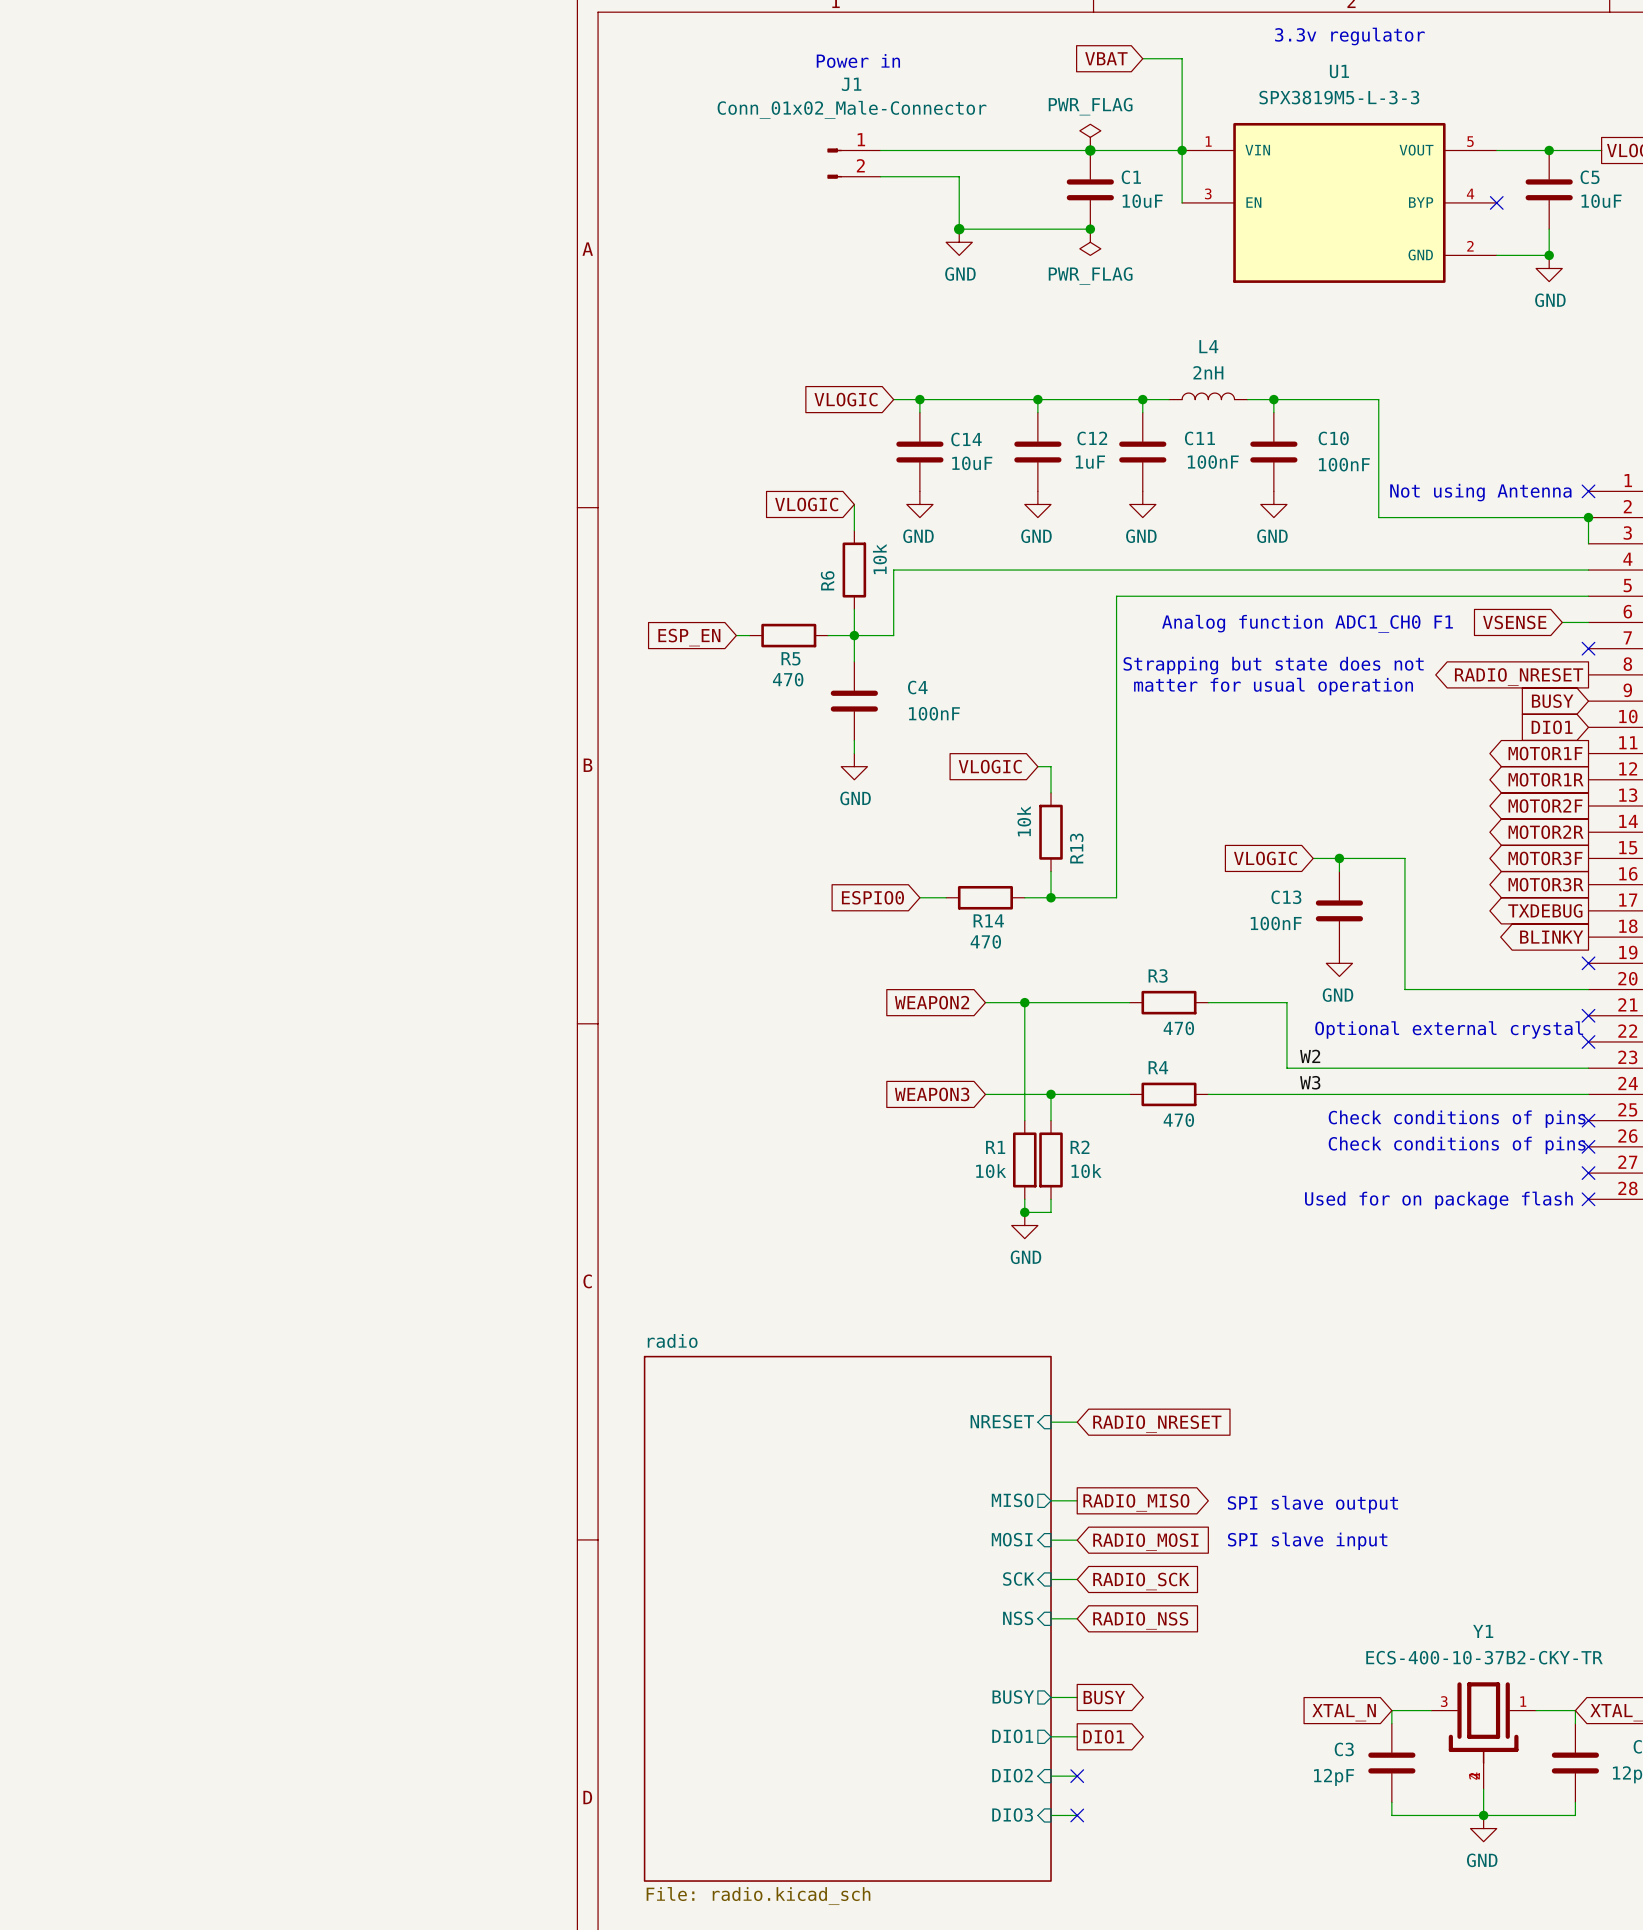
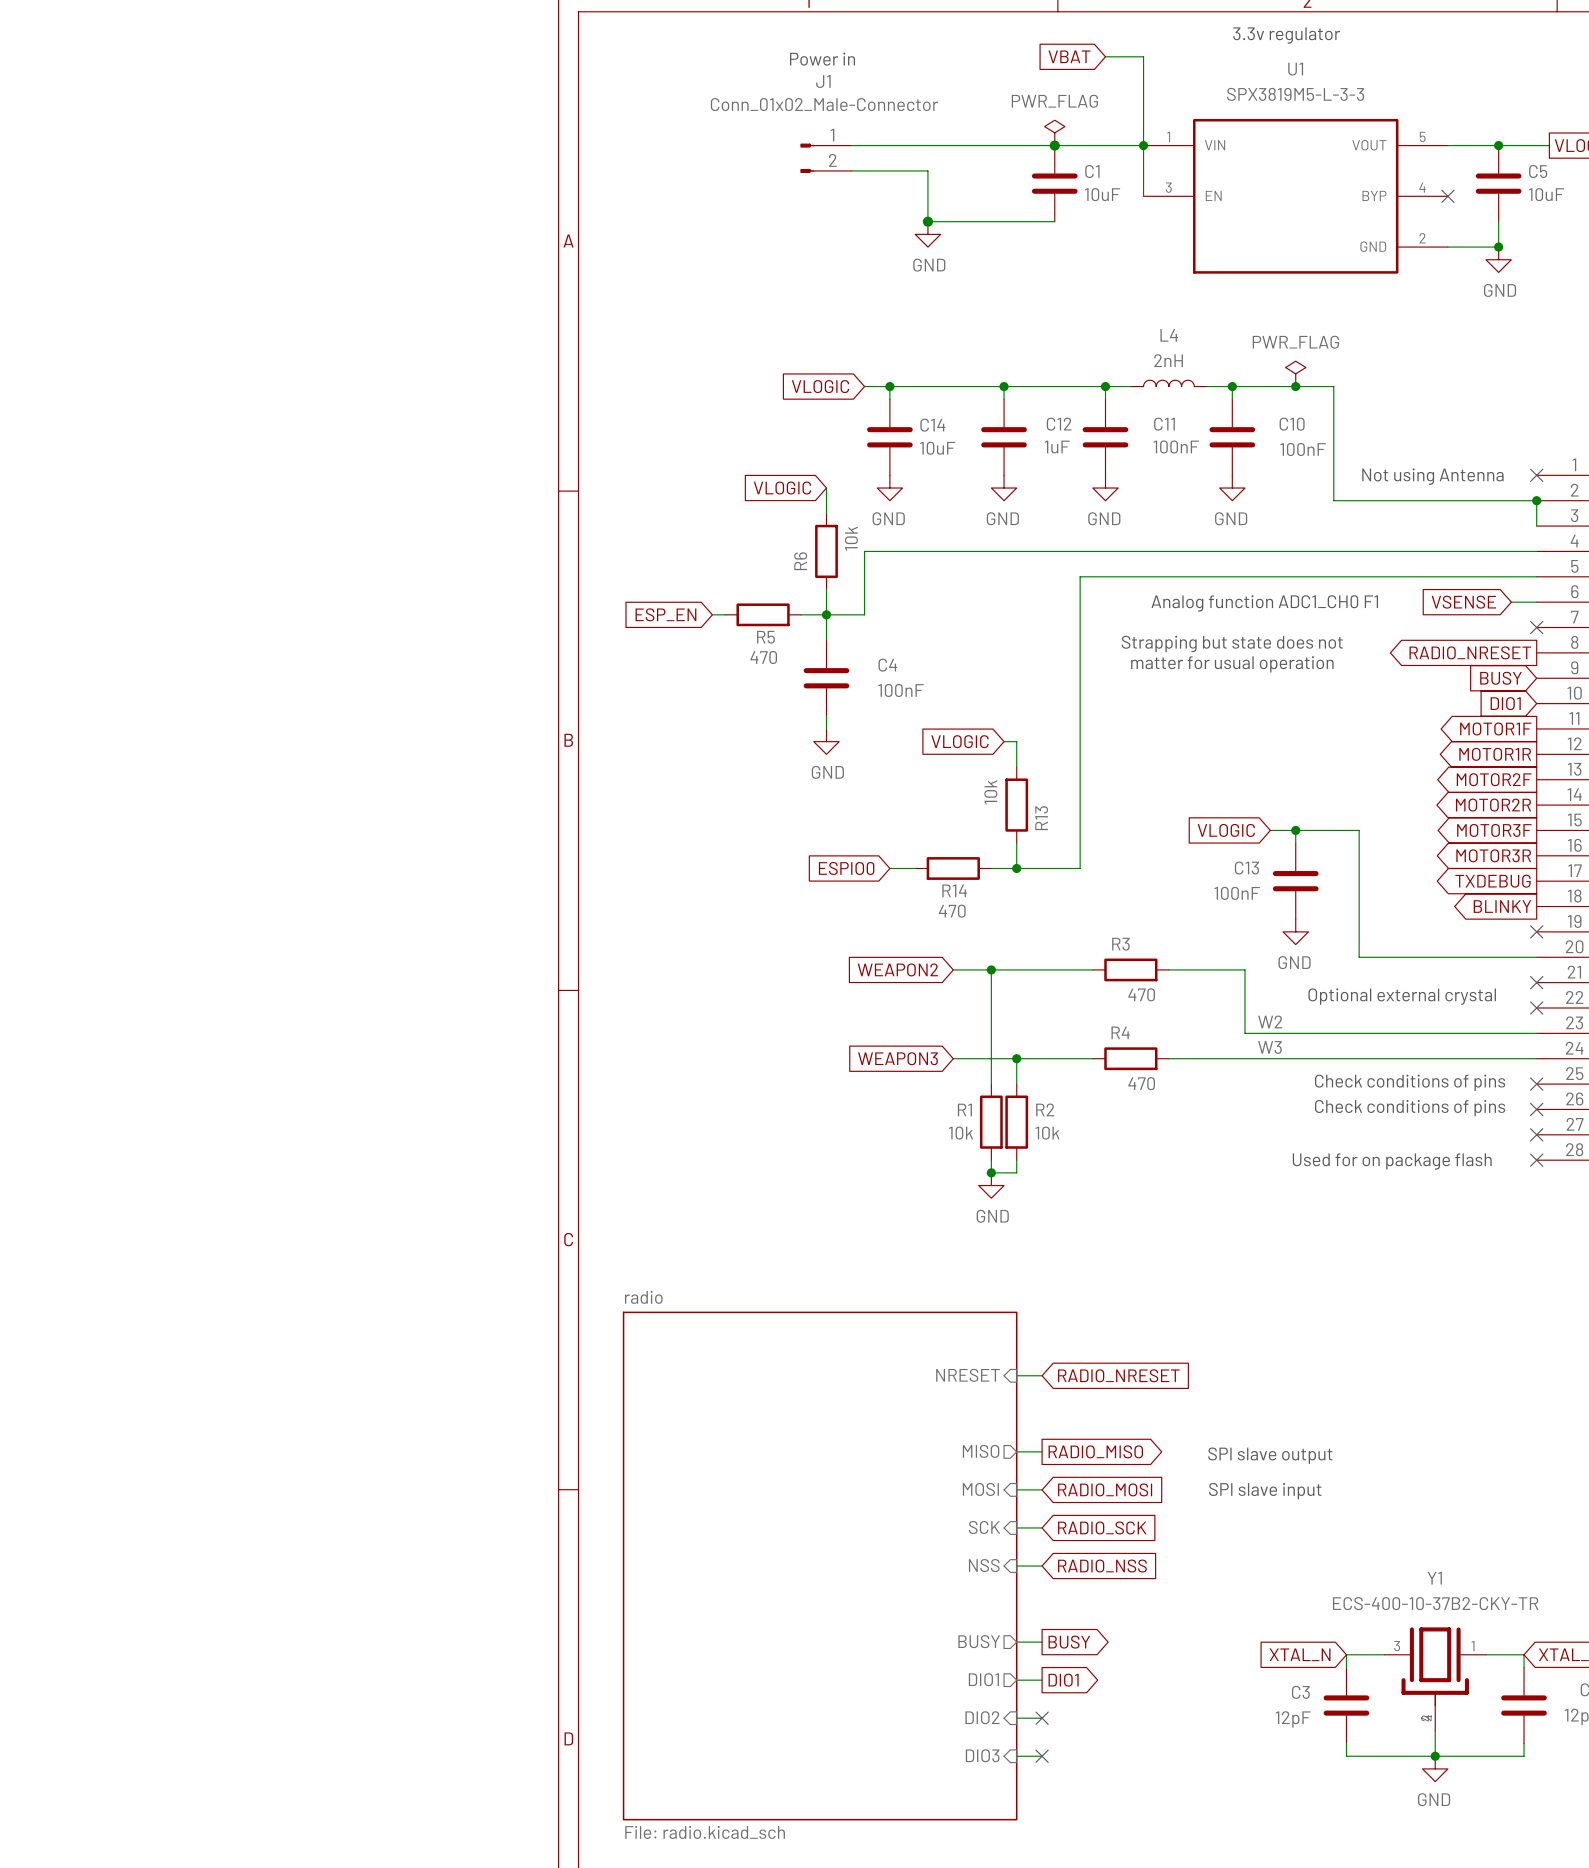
junction: (1090, 229) -> none
power symbol: PWR_FLAG (1090, 242) -> none
power symbol: none -> PWR_FLAG (1295, 373)
junction: none -> (1295, 386)

